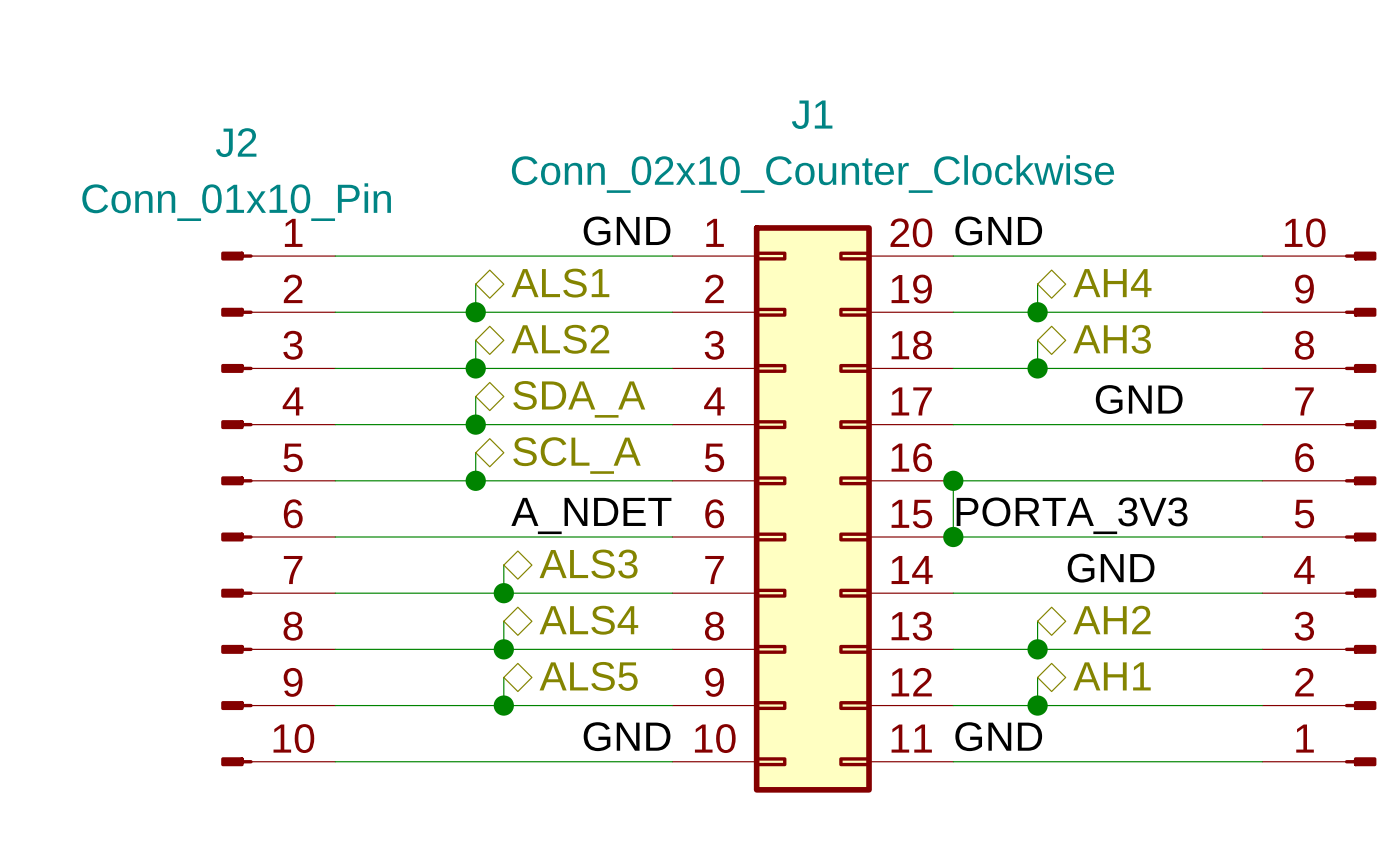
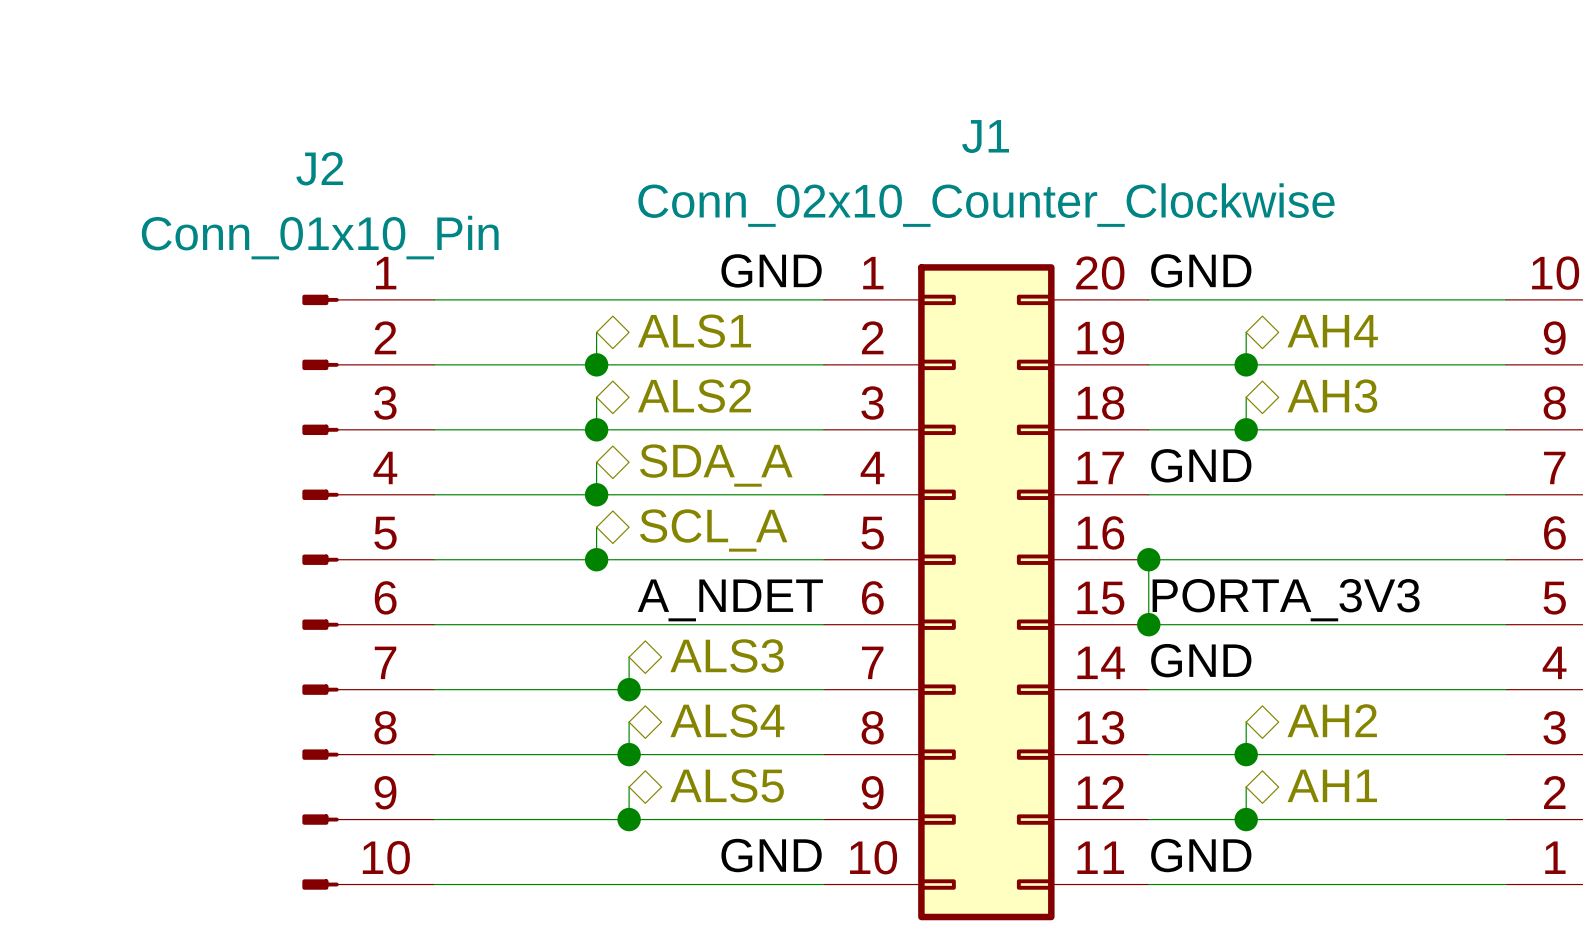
label: none -> GND (1201, 465)
label: GND (1139, 399) -> none
label: none -> GND (1201, 660)
label: GND (1111, 568) -> none

